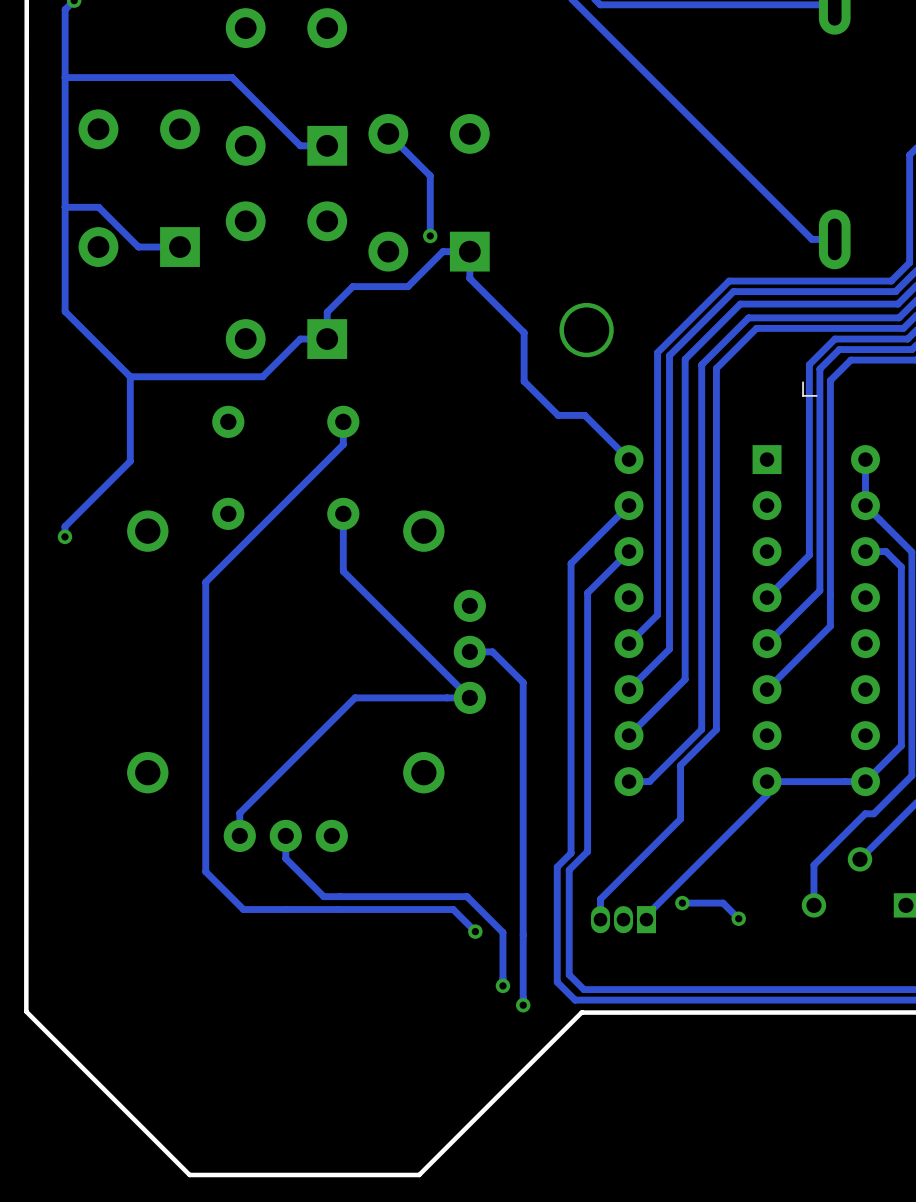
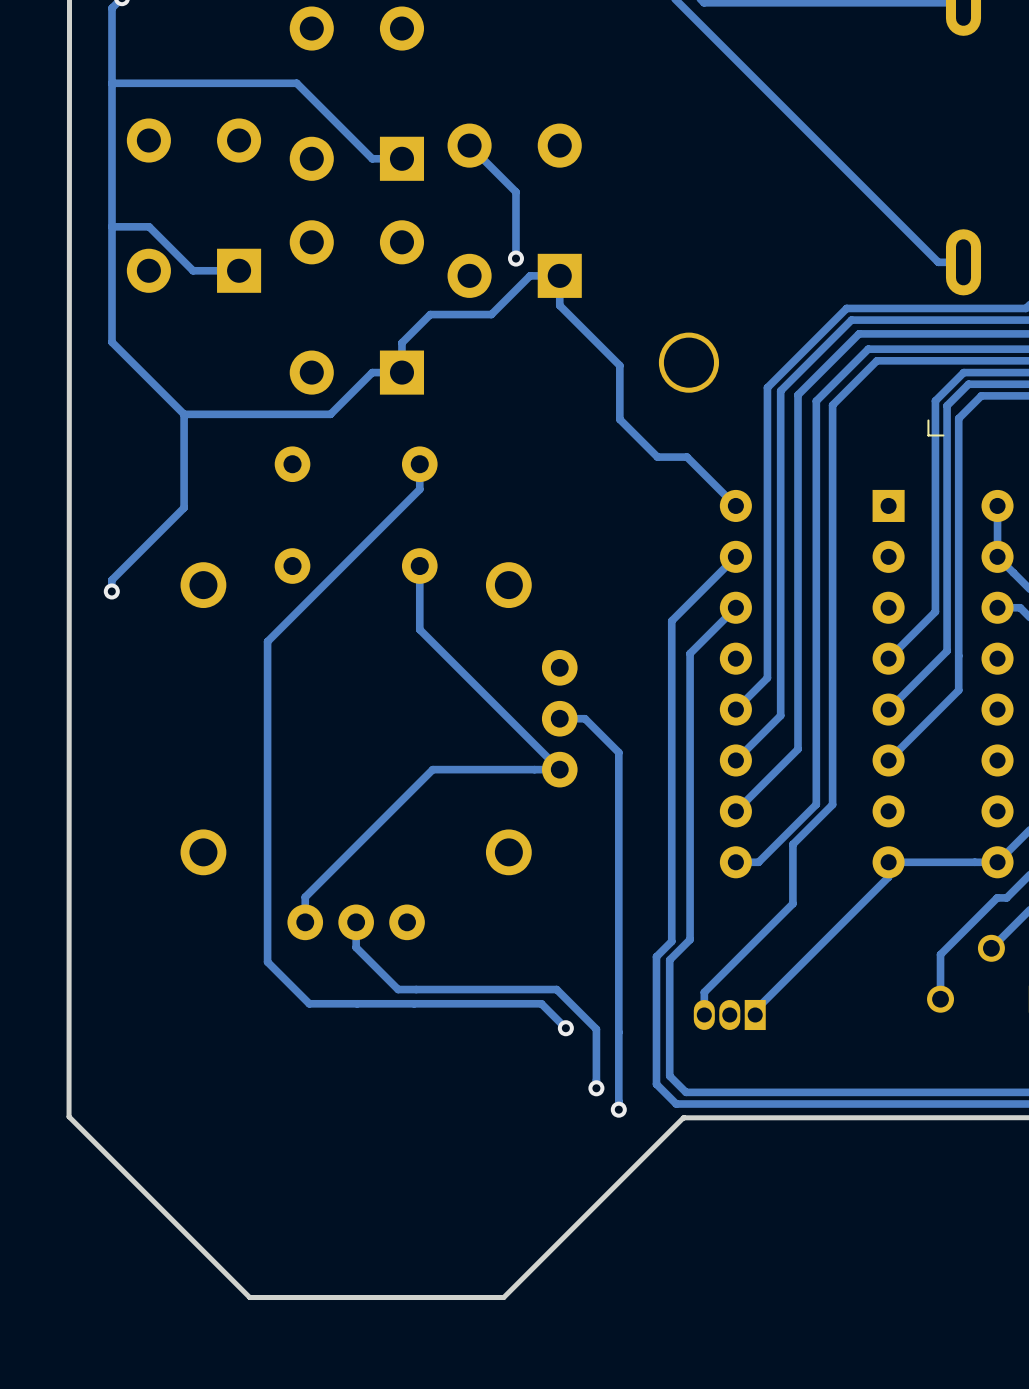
track: (682, 903) (723, 903) (738, 918) -> none
via: (682, 903) -> none
via: (738, 918) -> none

